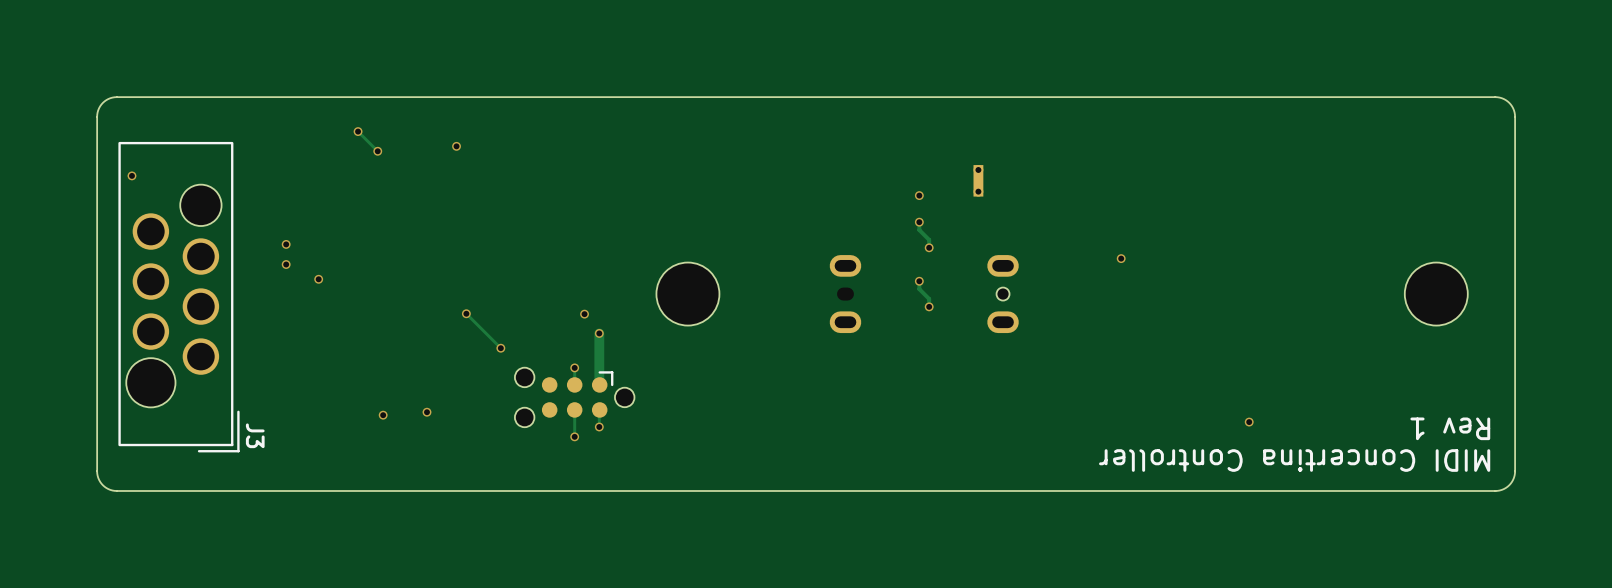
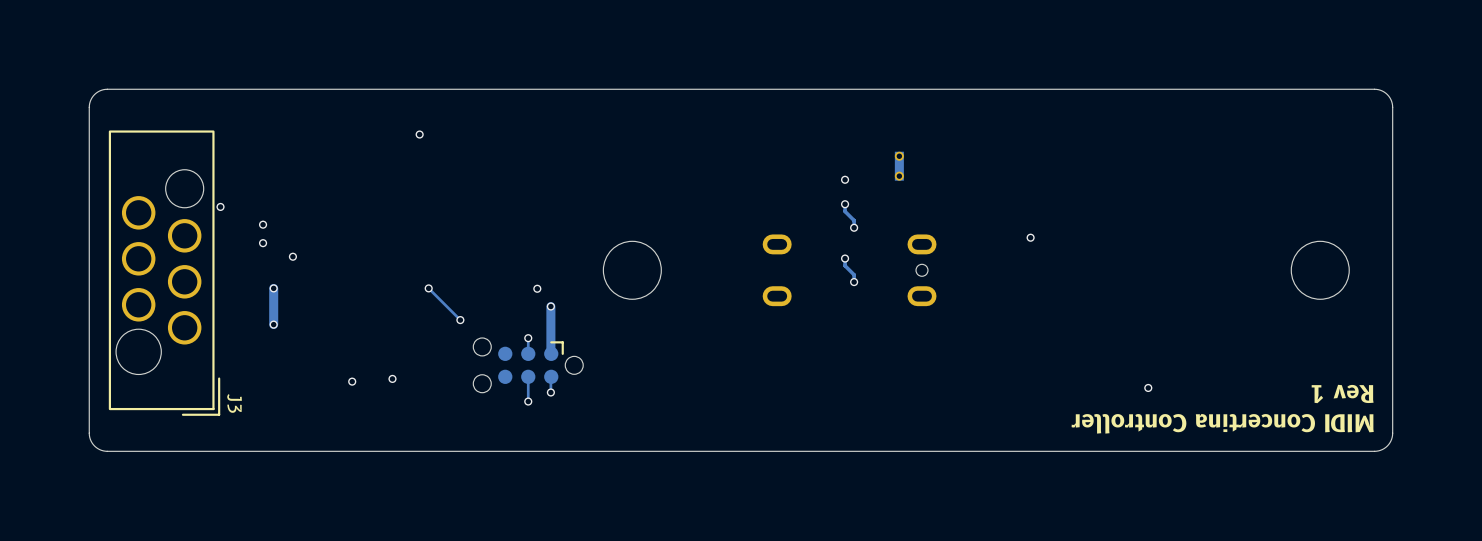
track: (358, 131) (377, 151) -> none
via: (358, 131) -> none
via: (377, 151) -> none
via: (131, 175) -> none
via: none -> (220, 206)
track: none -> (273, 288) (273, 324)
via: none -> (273, 288)
via: none -> (273, 324)

